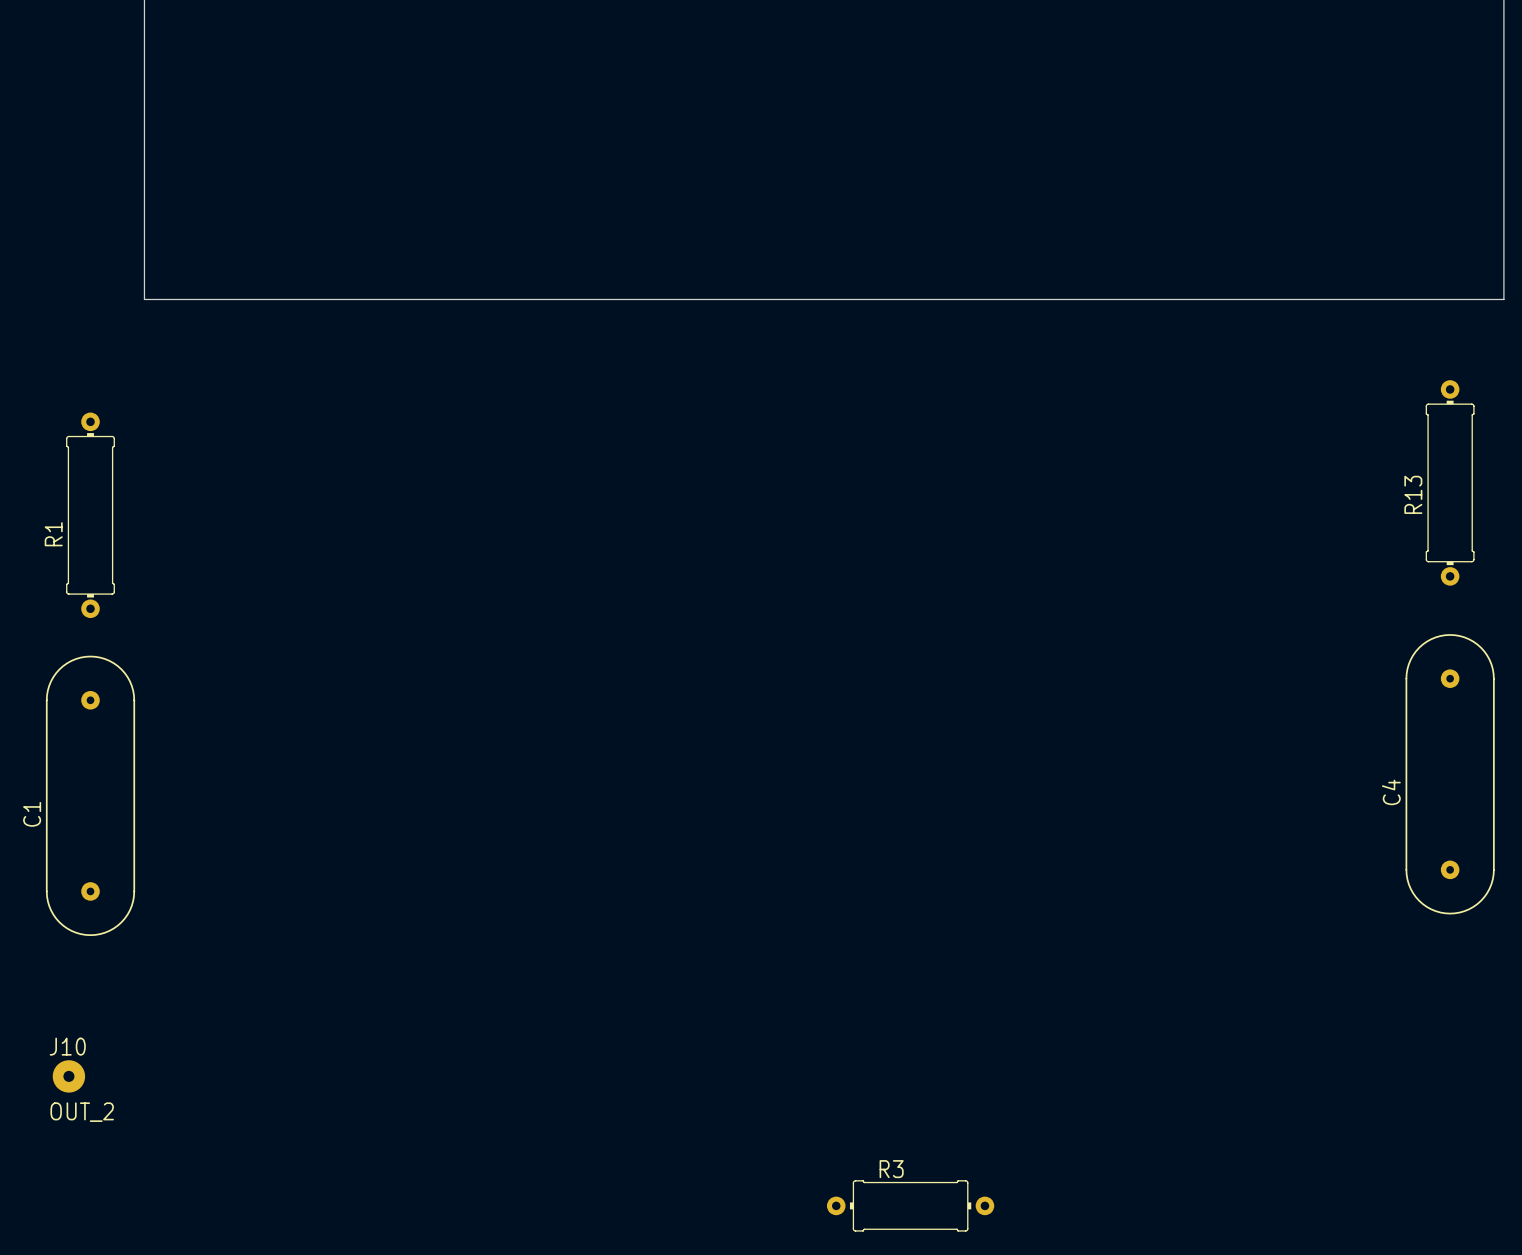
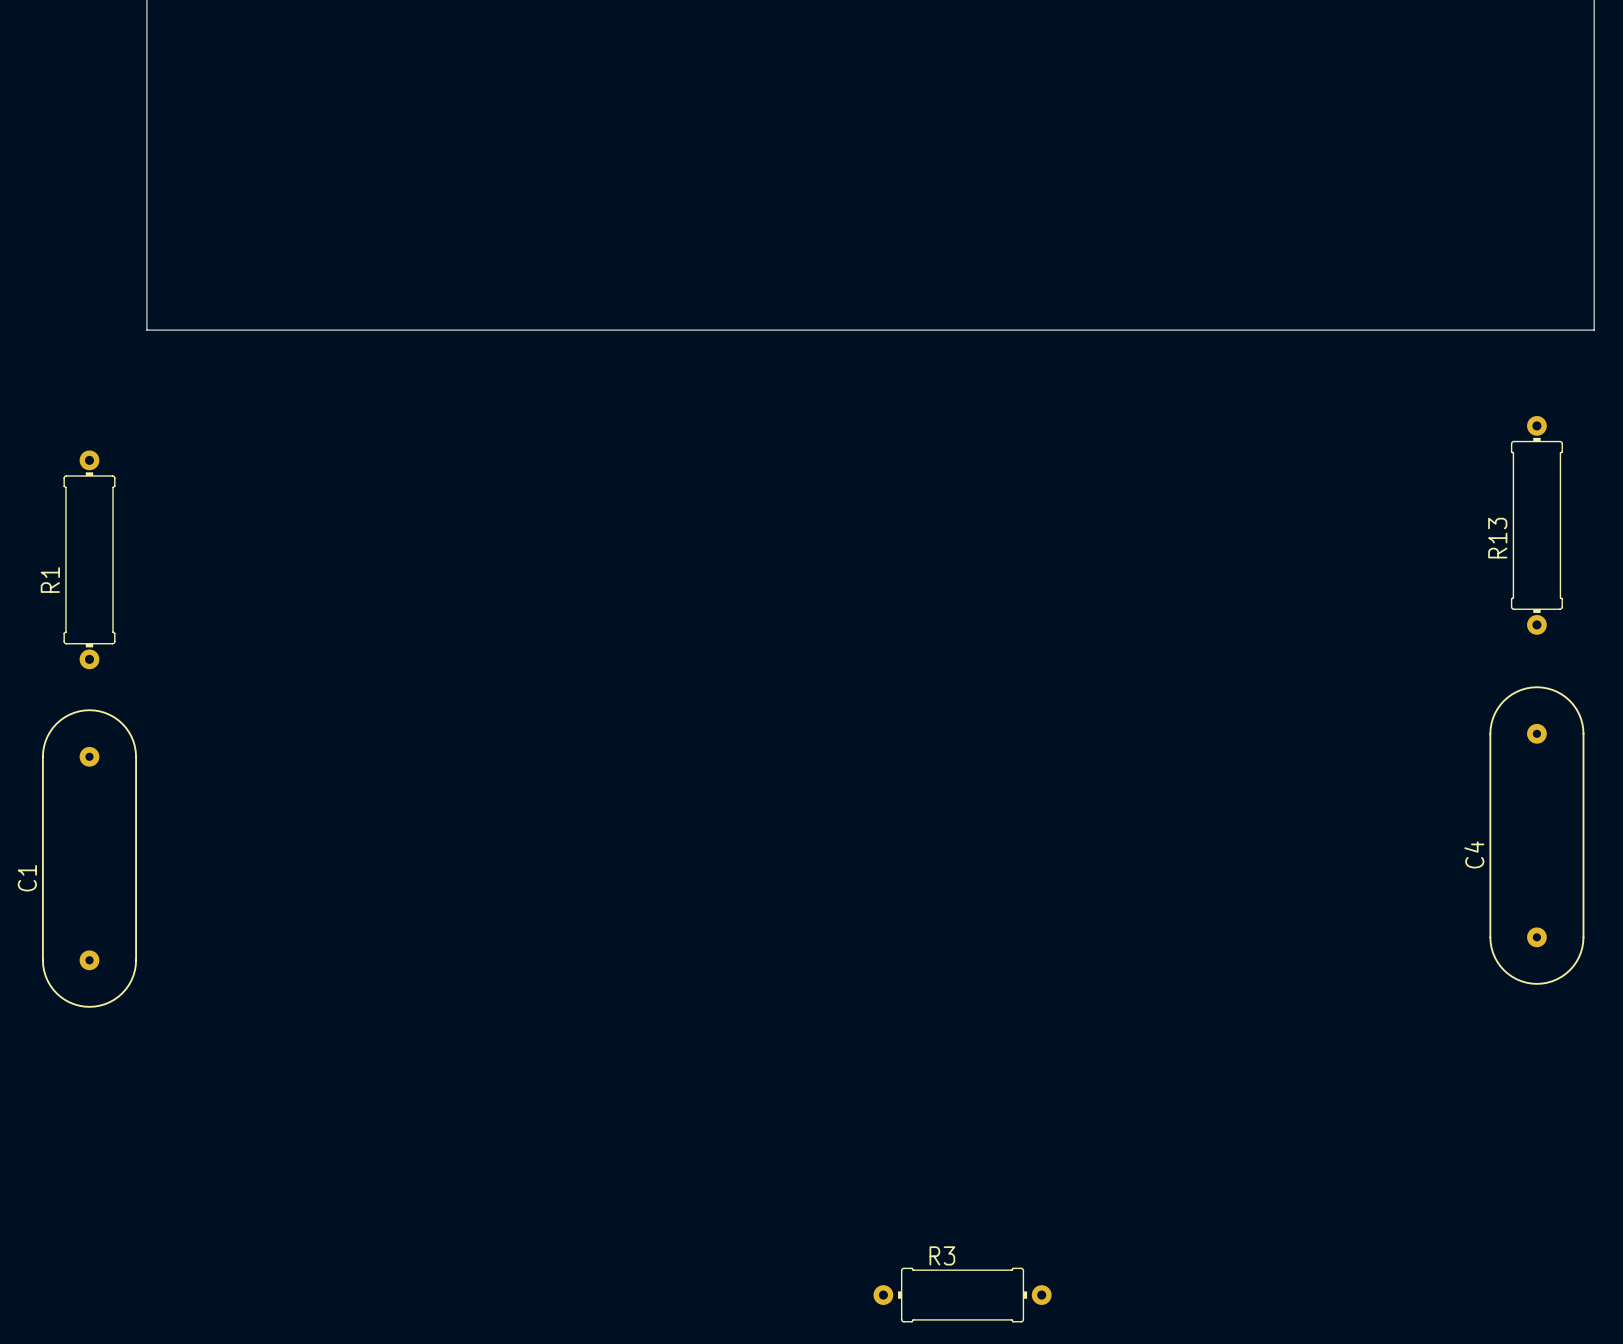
J10: OUT_2 (68, 1076) -> none

